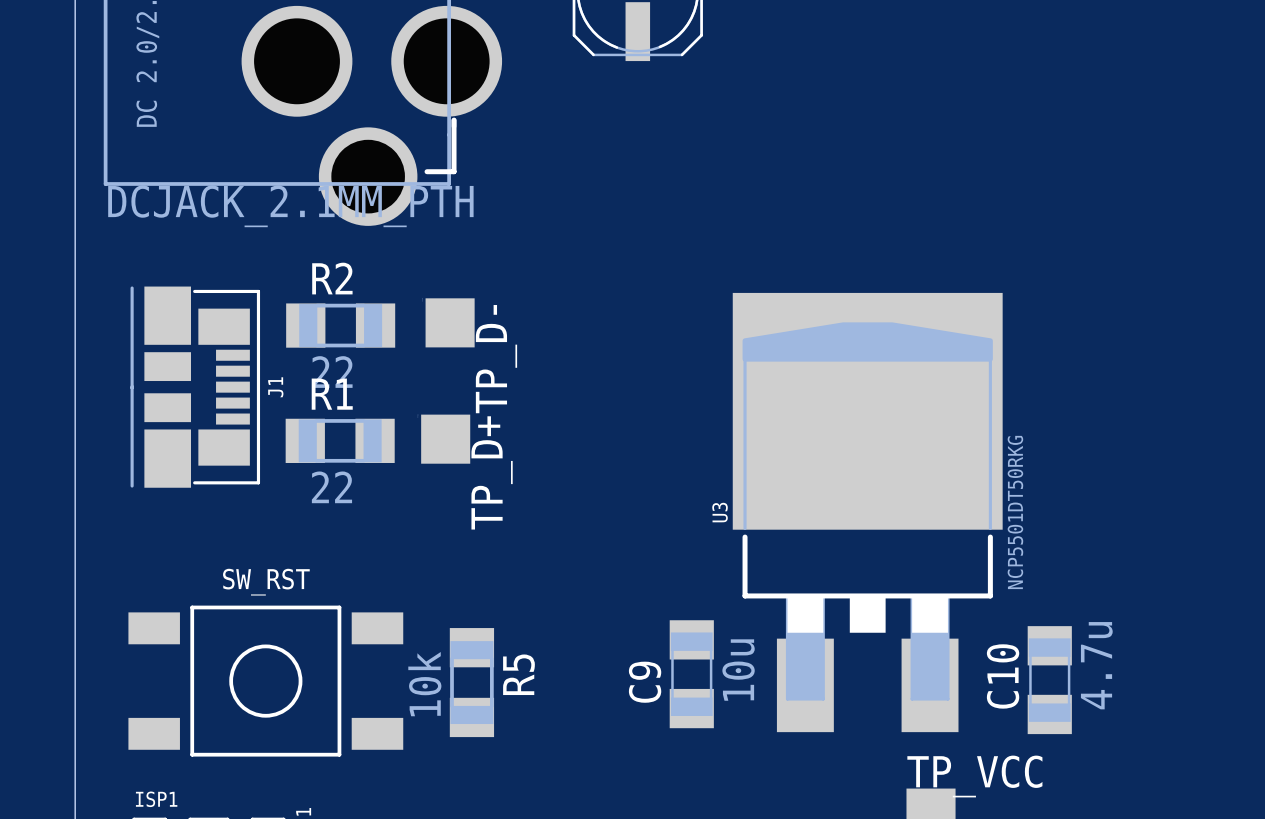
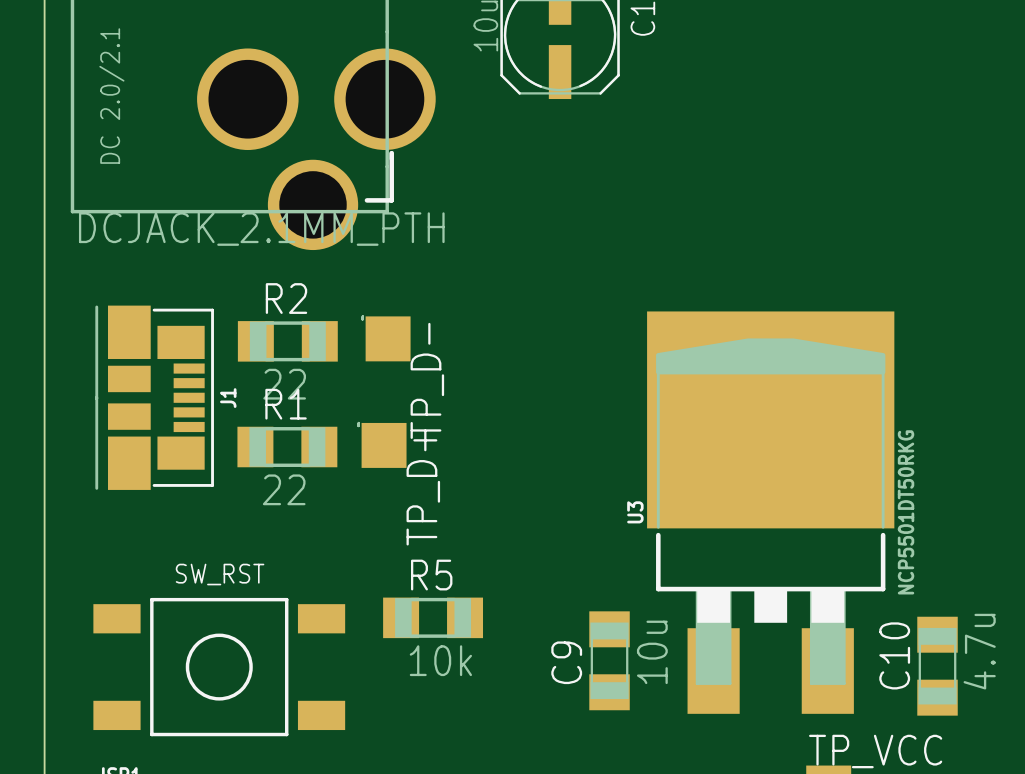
R5 name position: R5 (518, 674) -> R5 (431, 575)
R5 rotation: 0° (471, 682) -> 90° clockwise (433, 617)
R5 value position: 10k (424, 684) -> 10k (440, 660)

